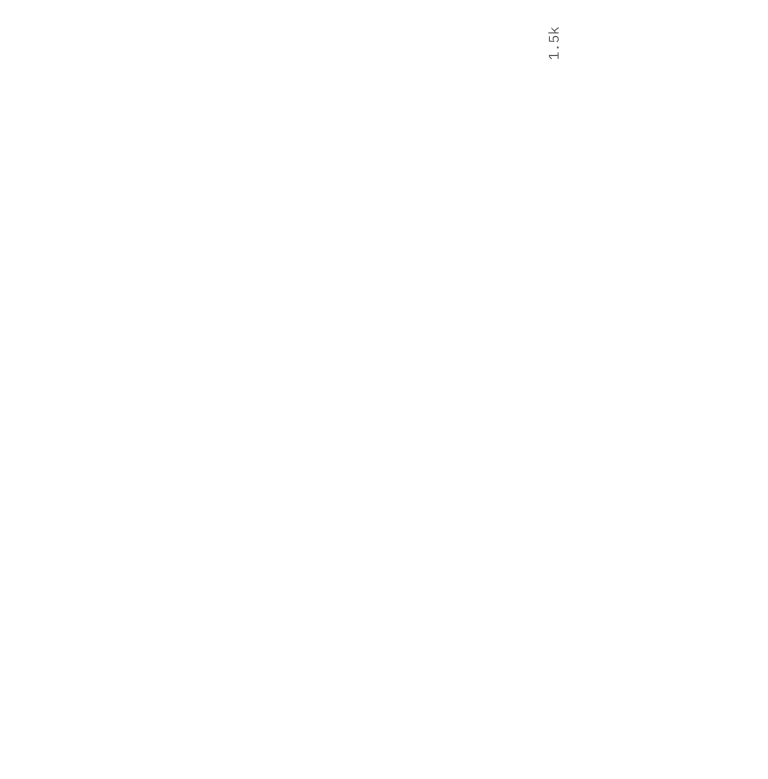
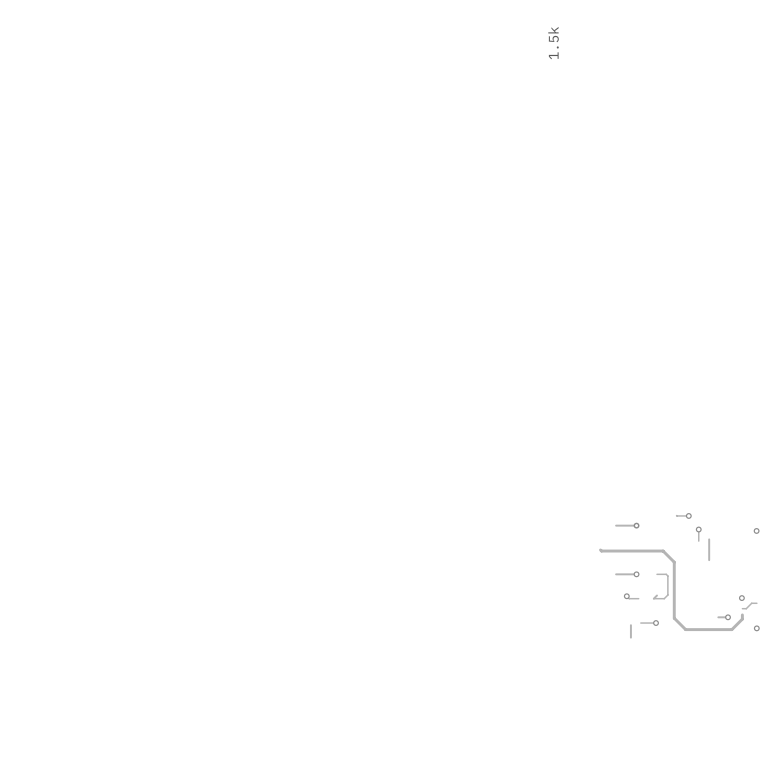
track: none -> (676, 515) (688, 515)
via: none -> (688, 515)
track: none -> (616, 525) (636, 525)
via: none -> (636, 525)
track: none -> (698, 529) (698, 541)
via: none -> (698, 529)
via: none -> (756, 530)
track: none -> (709, 539) (709, 560)
track: none -> (600, 549) (663, 551) (674, 562) (674, 618) (685, 629) (731, 629) (742, 619) (742, 614)
track: none -> (616, 574) (636, 574)
via: none -> (636, 574)
track: none -> (656, 574) (667, 575) (667, 595) (664, 598) (653, 598) (656, 595)
track: none -> (626, 596) (629, 598) (638, 598)
via: none -> (626, 596)
via: none -> (741, 598)
track: none -> (756, 603) (751, 603) (746, 608) (742, 608)
track: none -> (718, 617) (728, 617)
via: none -> (728, 617)
track: none -> (640, 623) (656, 623)
via: none -> (656, 623)
track: none -> (630, 625) (630, 637)
via: none -> (756, 628)

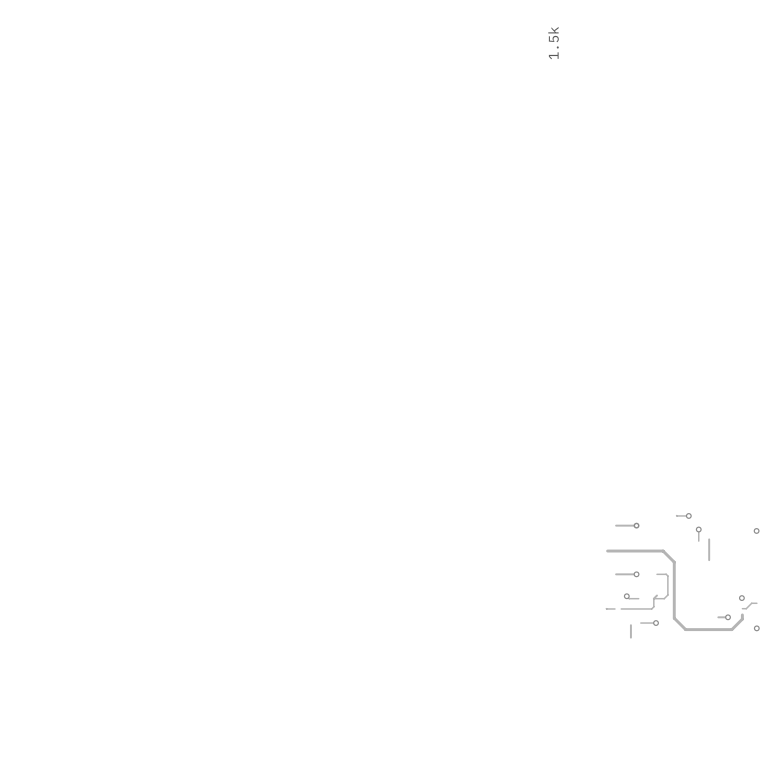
track: (600, 549) (607, 551) -> none
track: none -> (653, 598) (653, 606) (651, 608) (621, 608)
track: none -> (606, 608) (614, 608)

